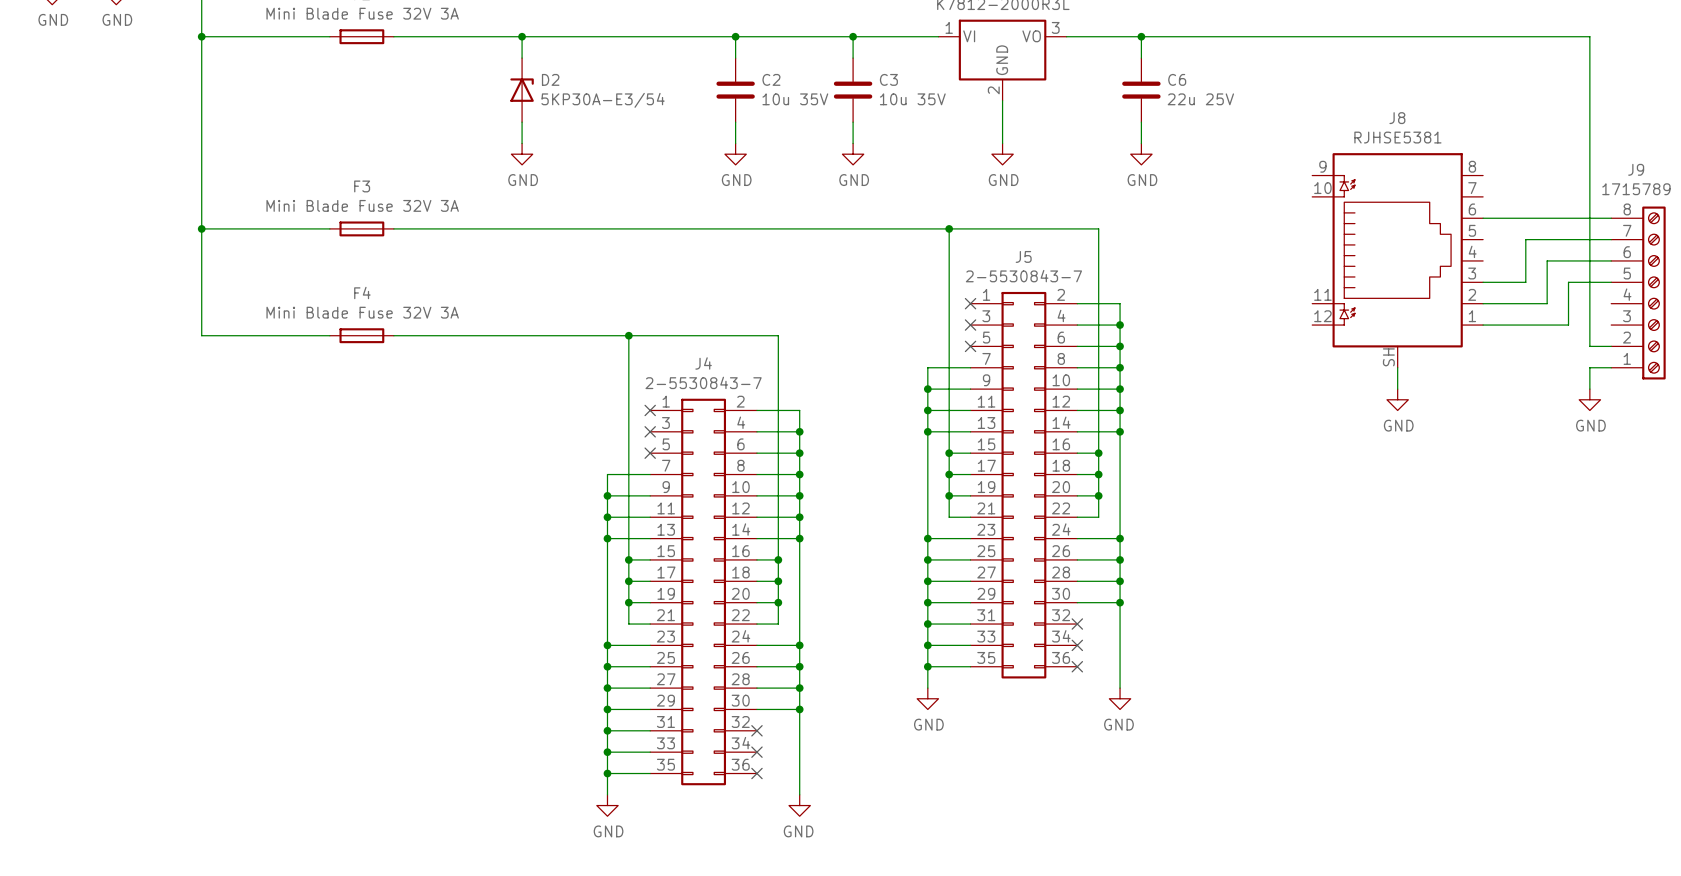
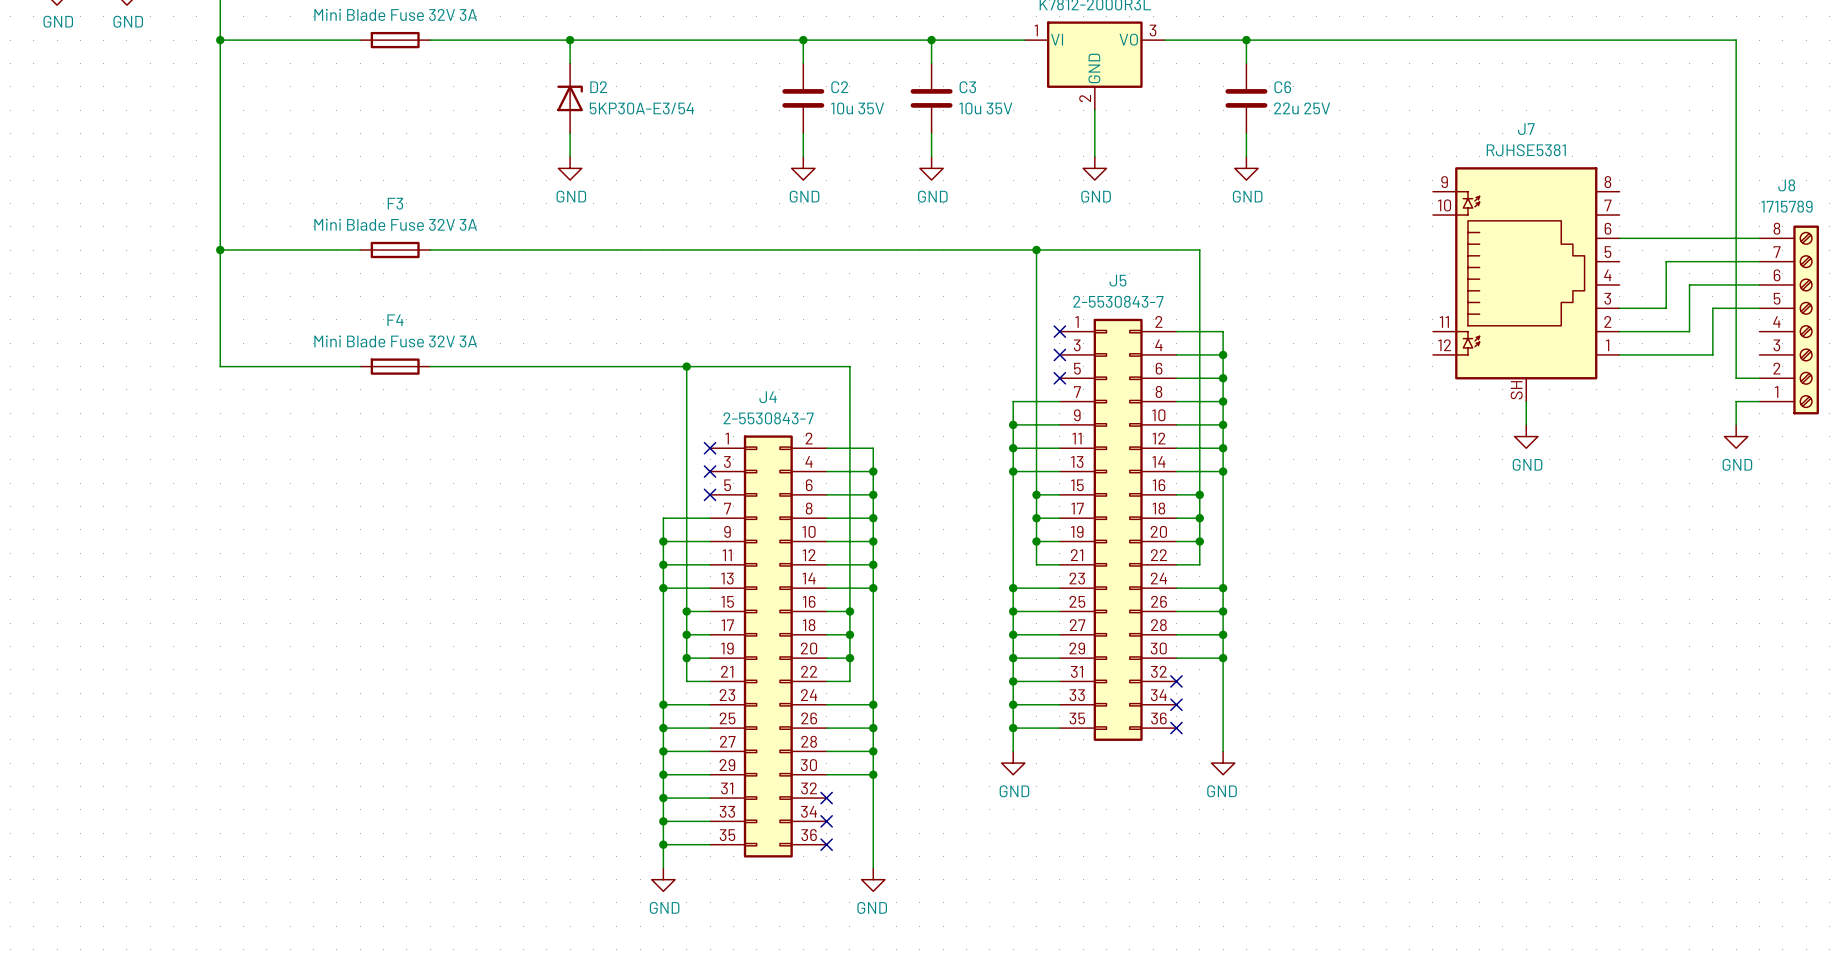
J8 name: J8 (1397, 118) -> J7 (1526, 129)
J9 name: J9 (1636, 169) -> J8 (1786, 185)

